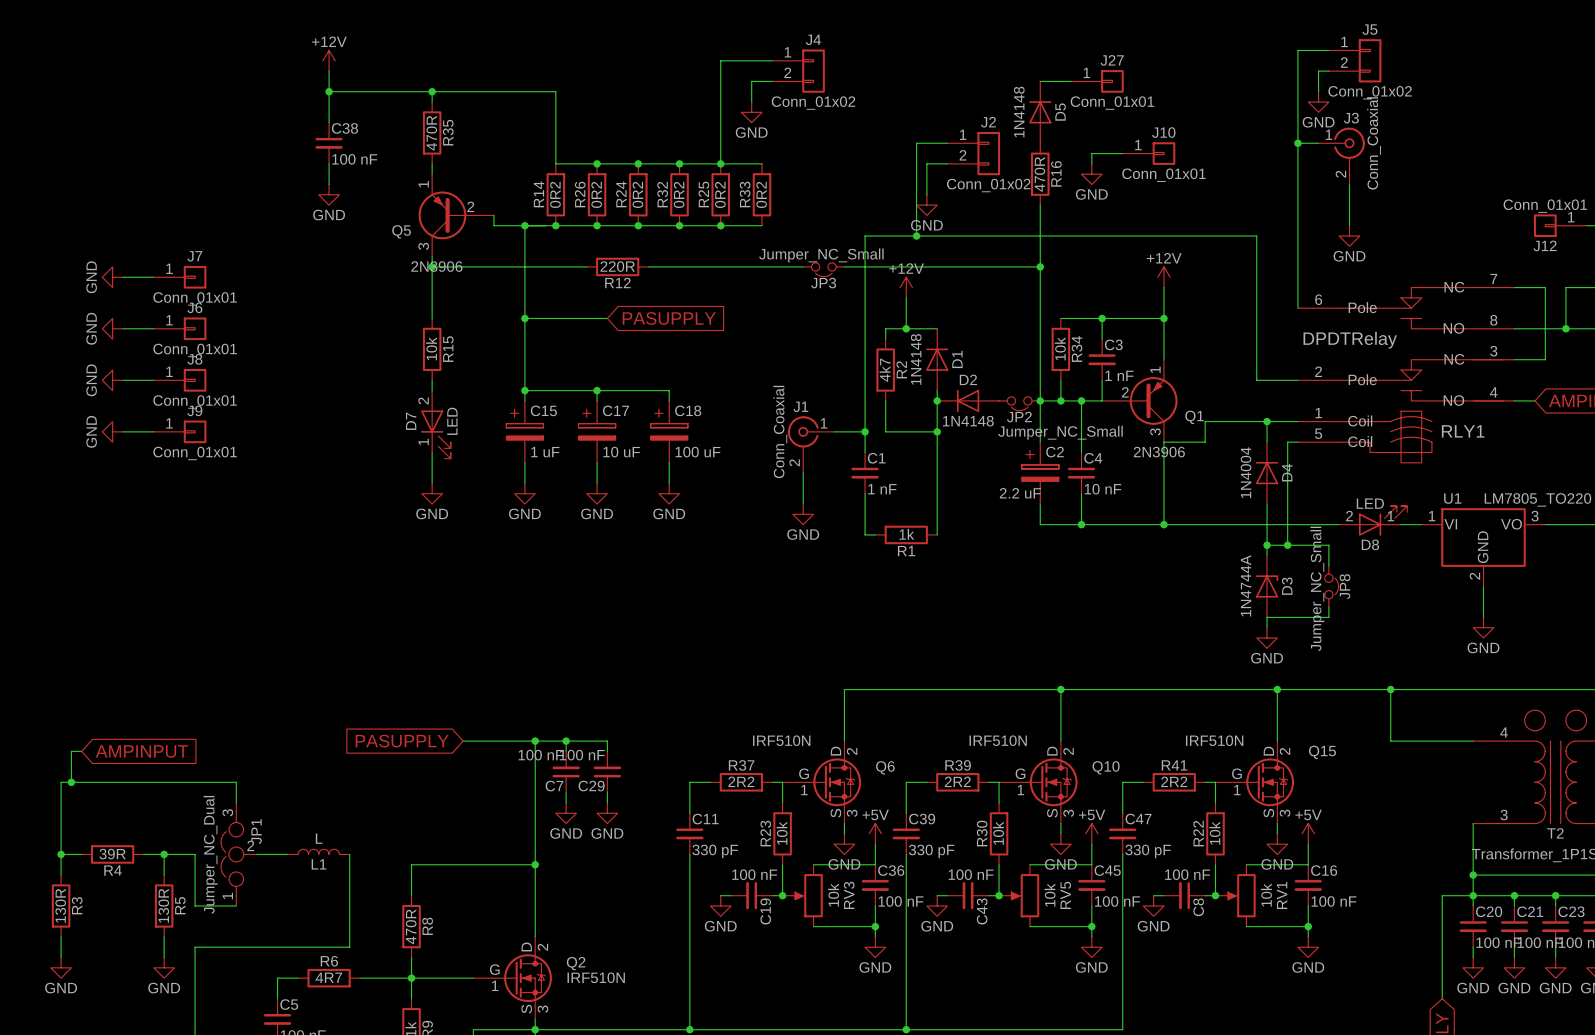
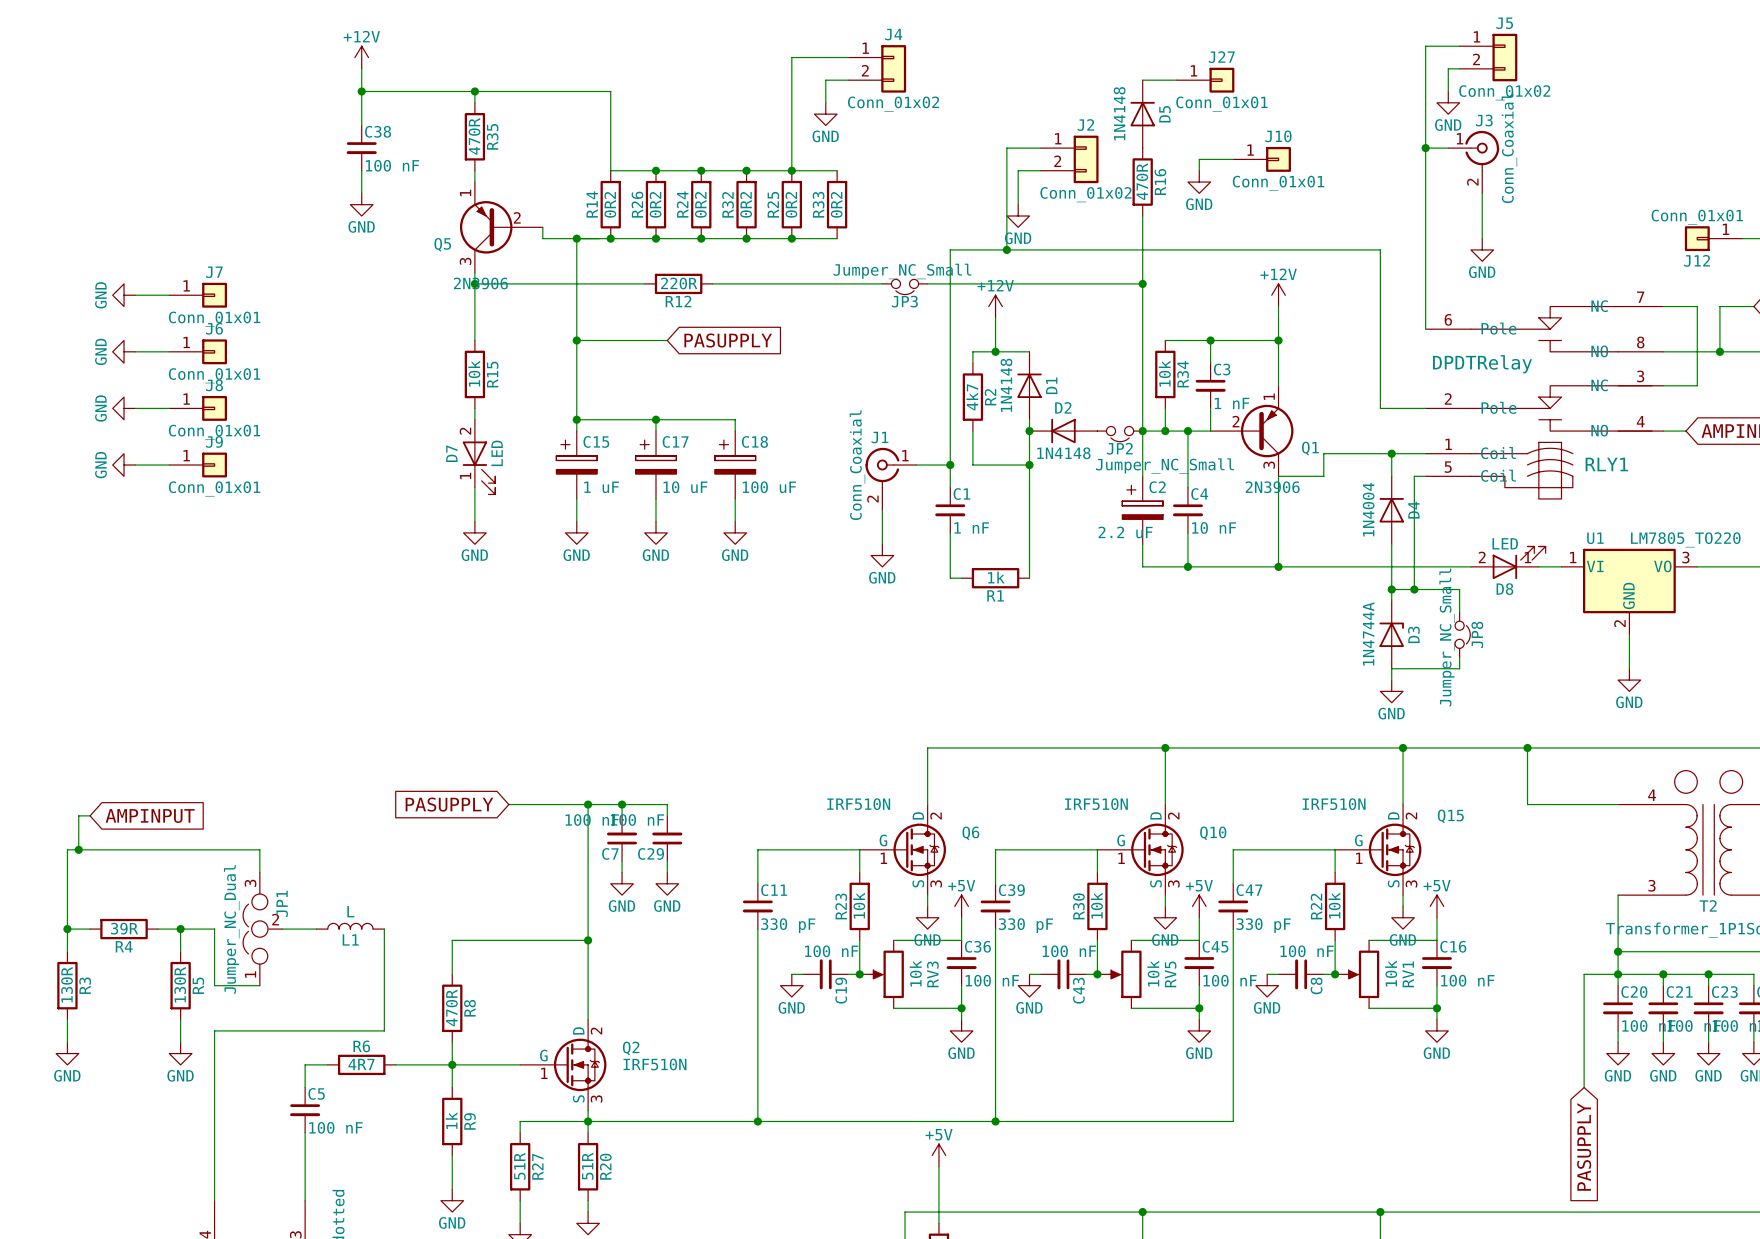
wire: none -> (780, 849) (848, 849)
R37: 2R2 (741, 782) -> none
wire: none -> (1018, 849) (1086, 849)
R39: 2R2 (957, 782) -> none
wire: none -> (1255, 849) (1323, 849)
R41: 2R2 (1174, 782) -> none

